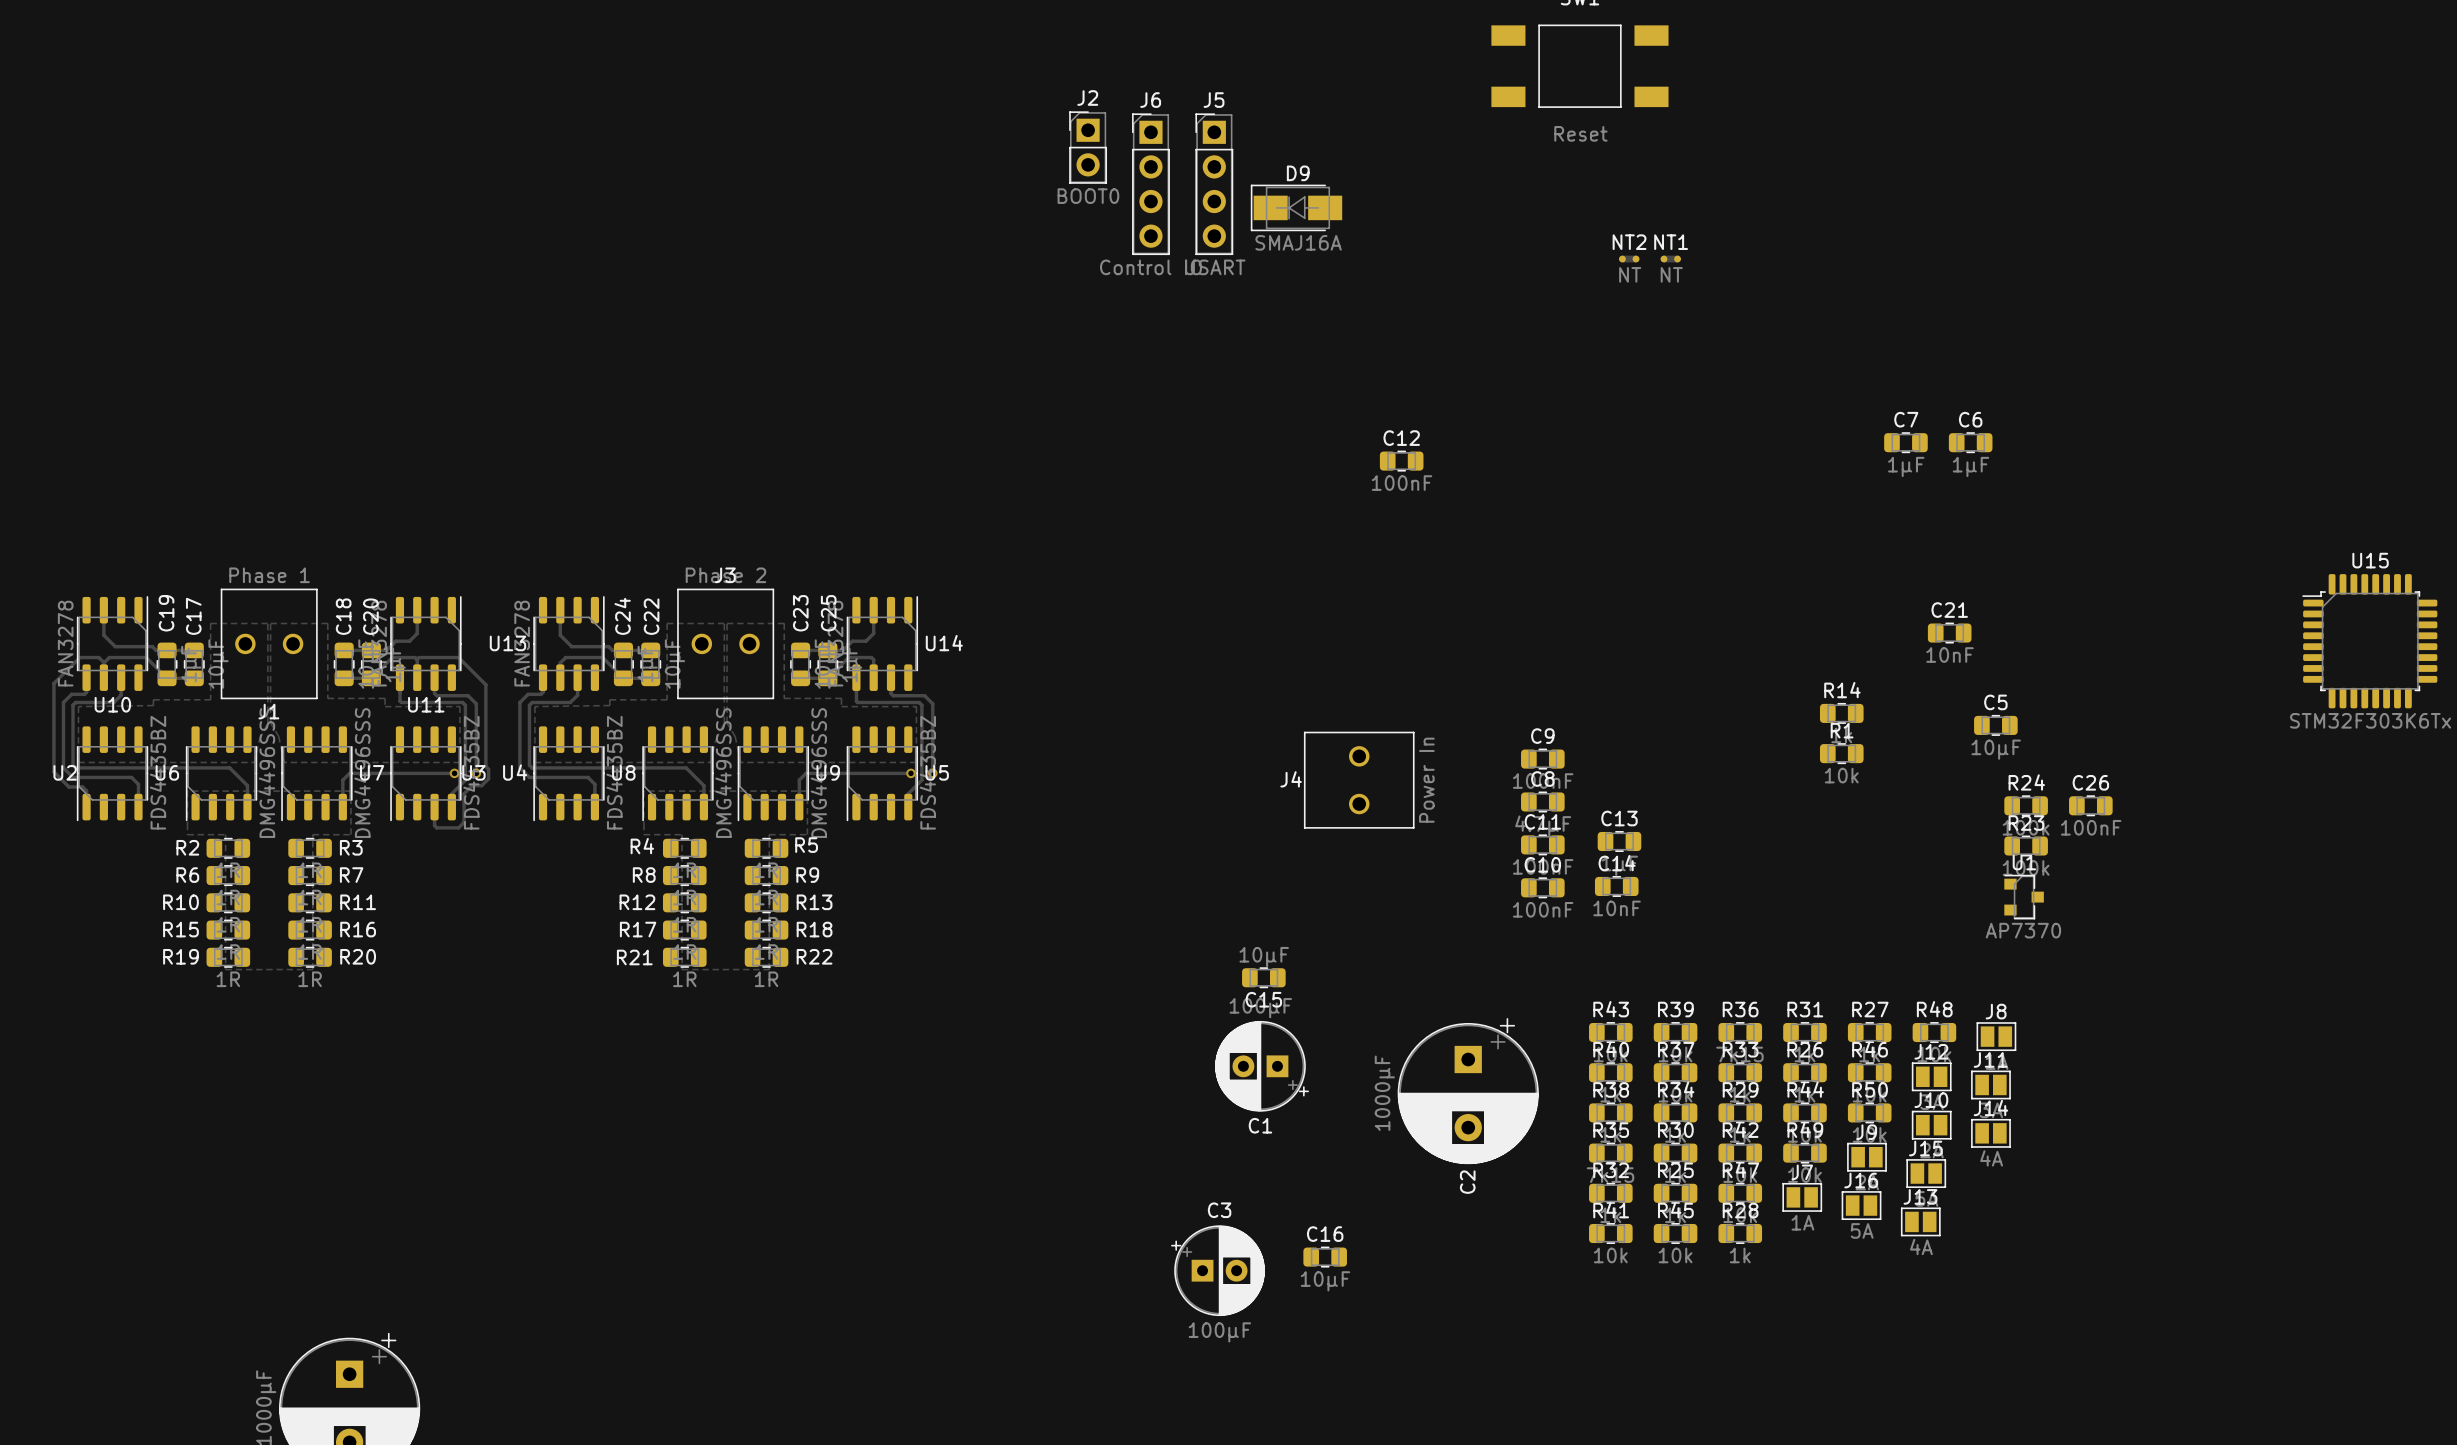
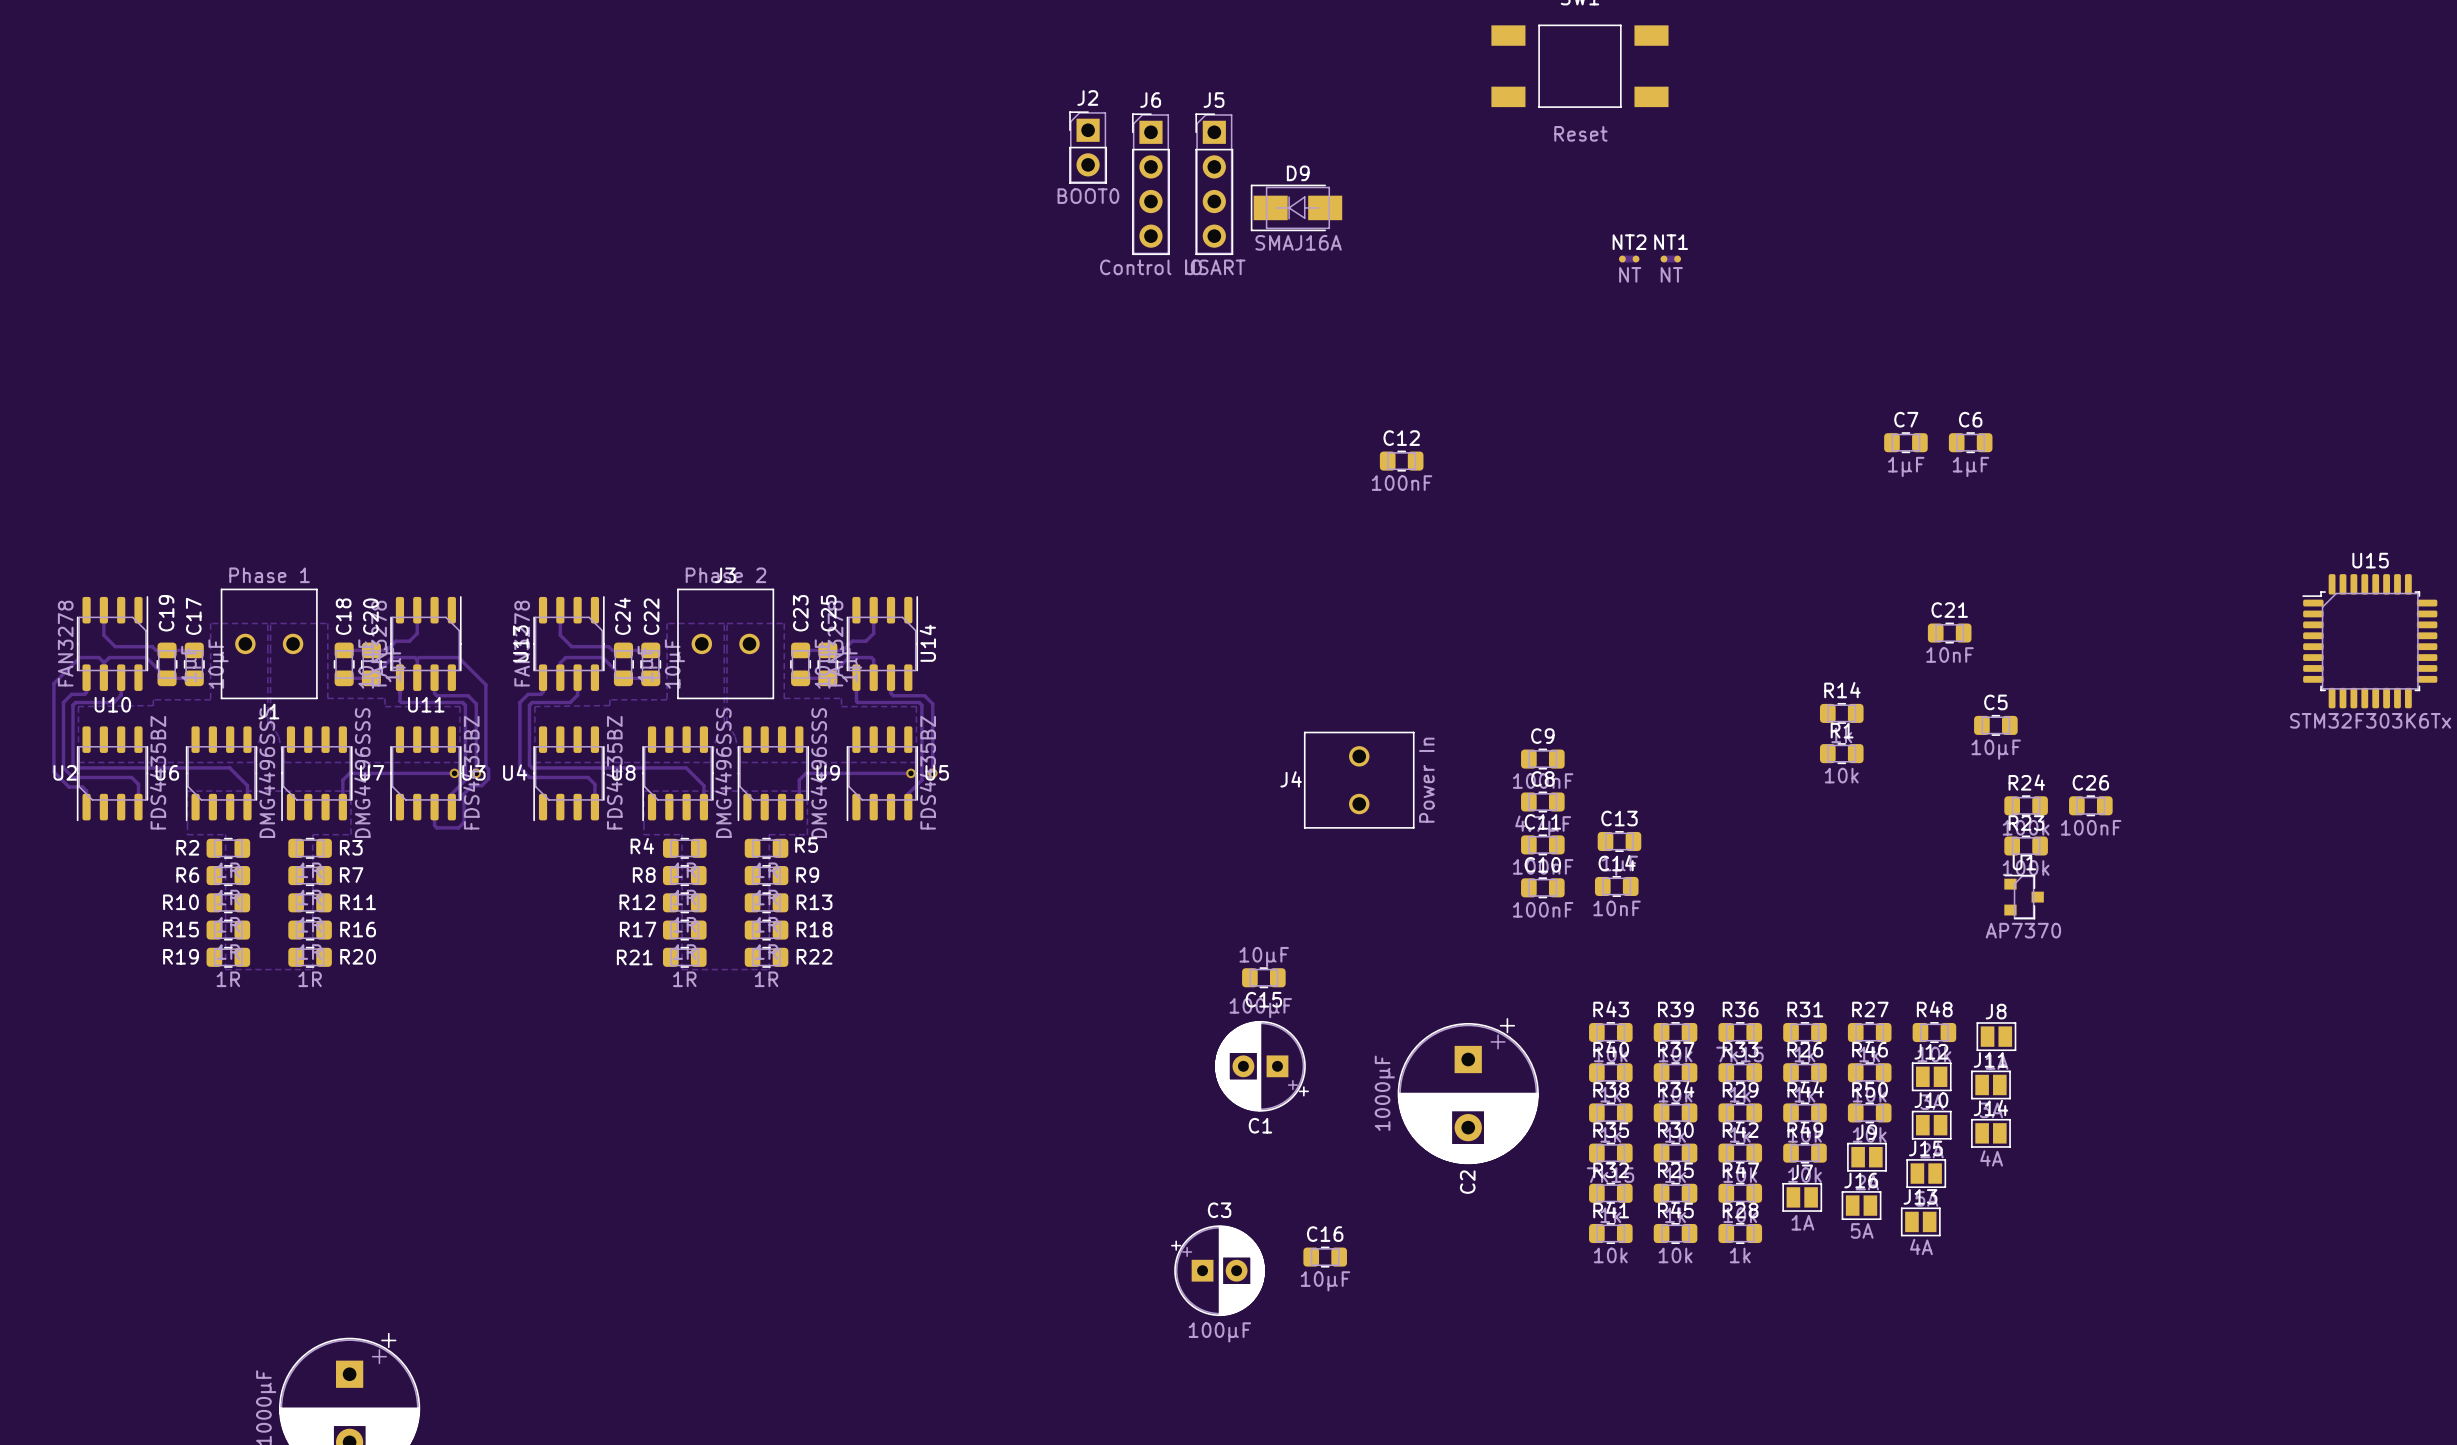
U13 name rotation: 0° (507, 643) -> 90° counterclockwise (520, 643)
U14 name rotation: 0° (944, 643) -> 90° counterclockwise (927, 643)

